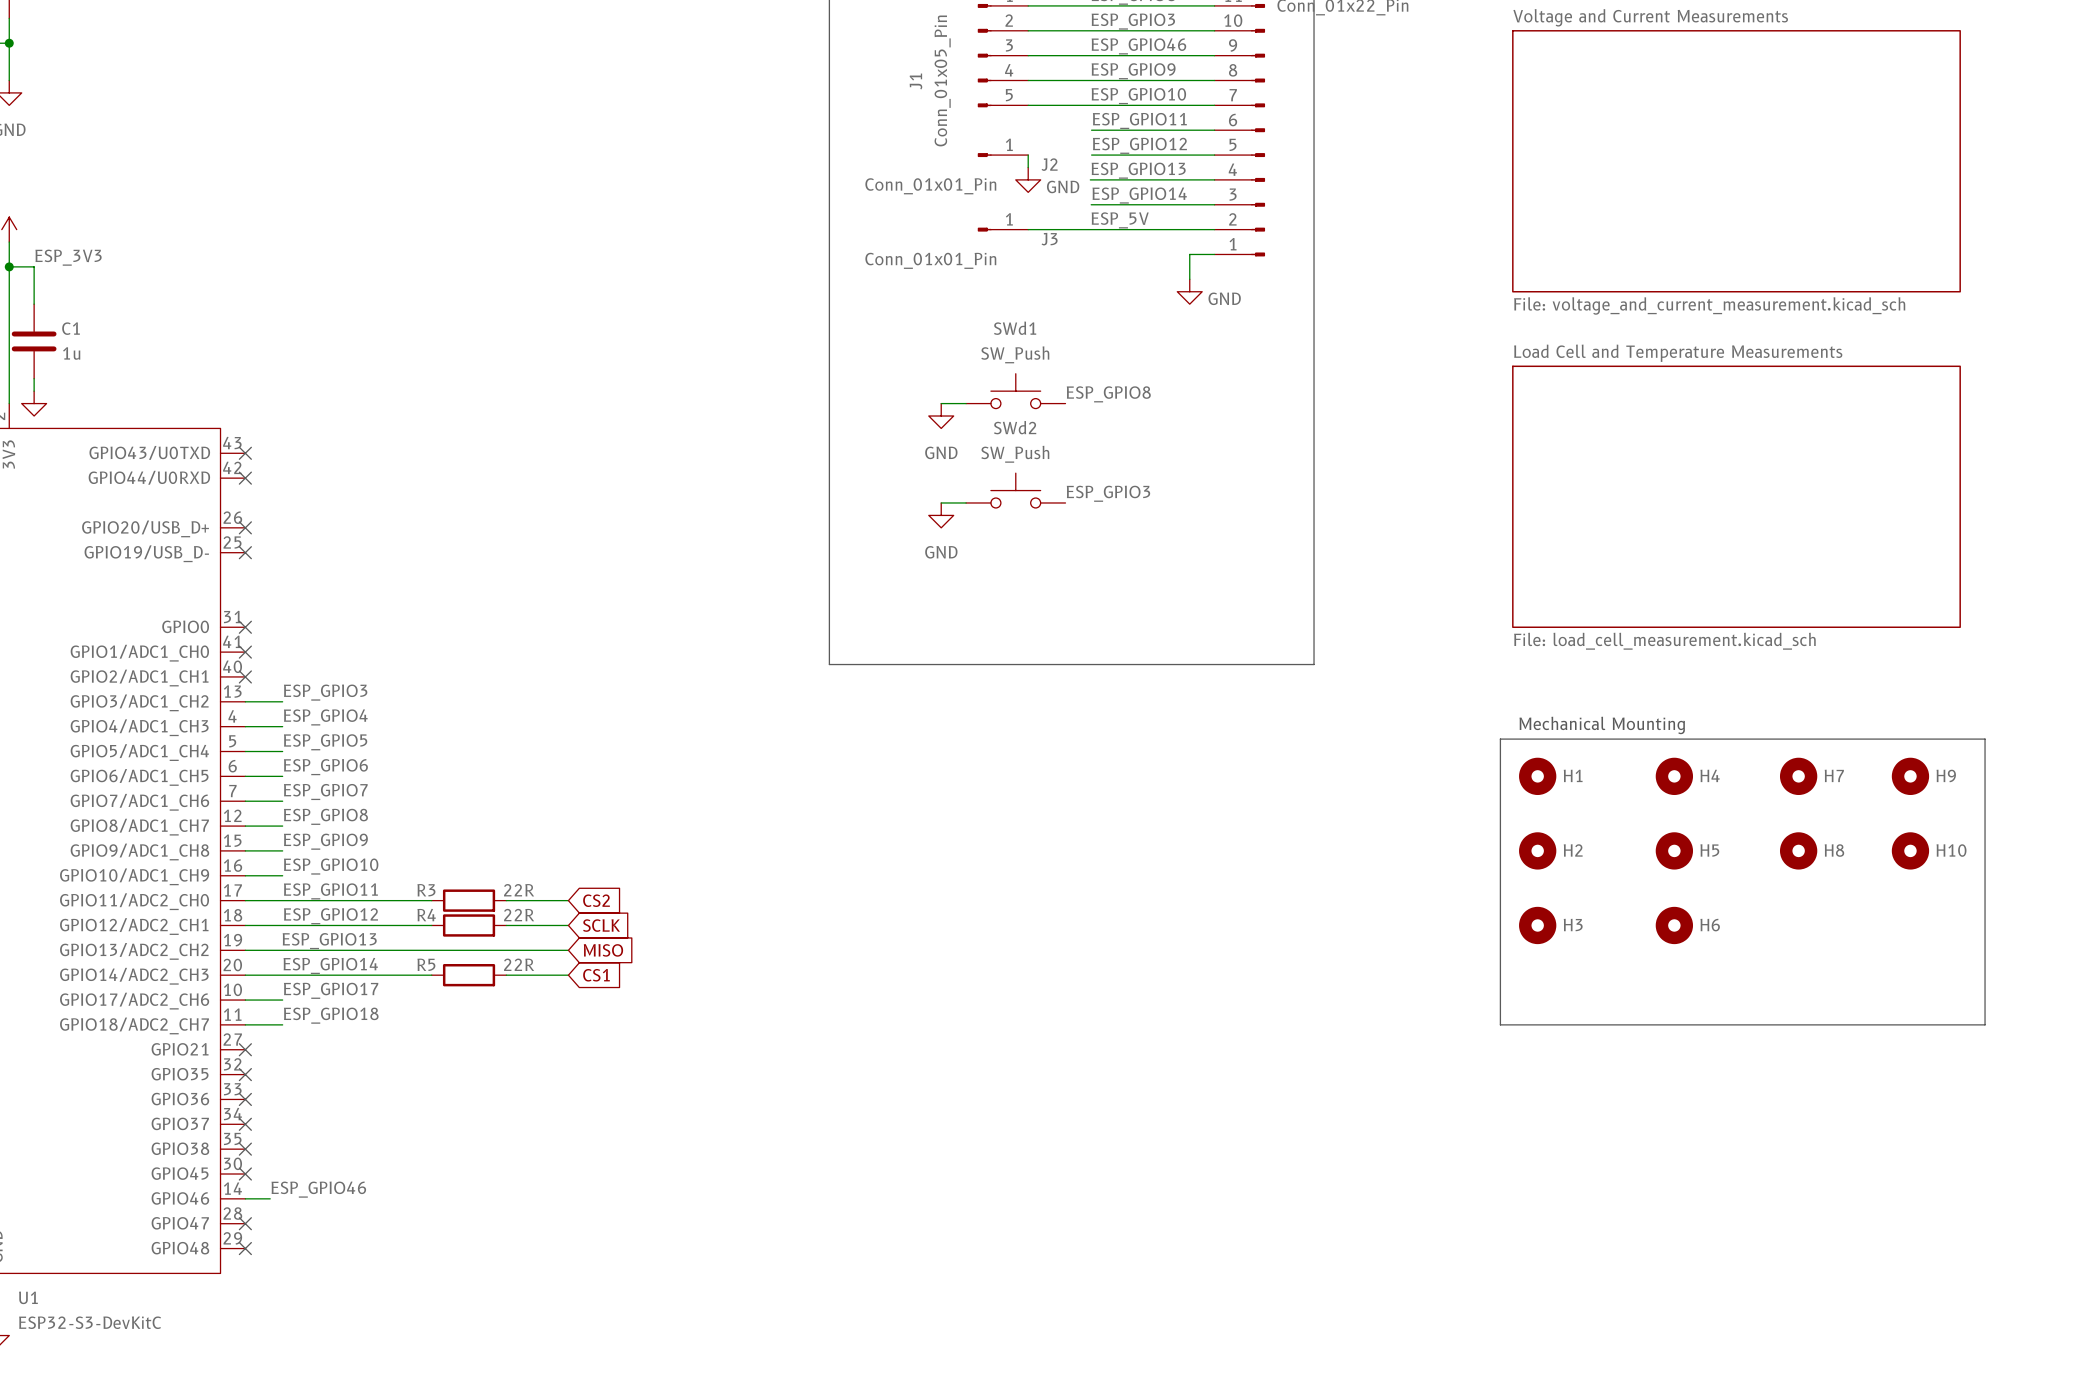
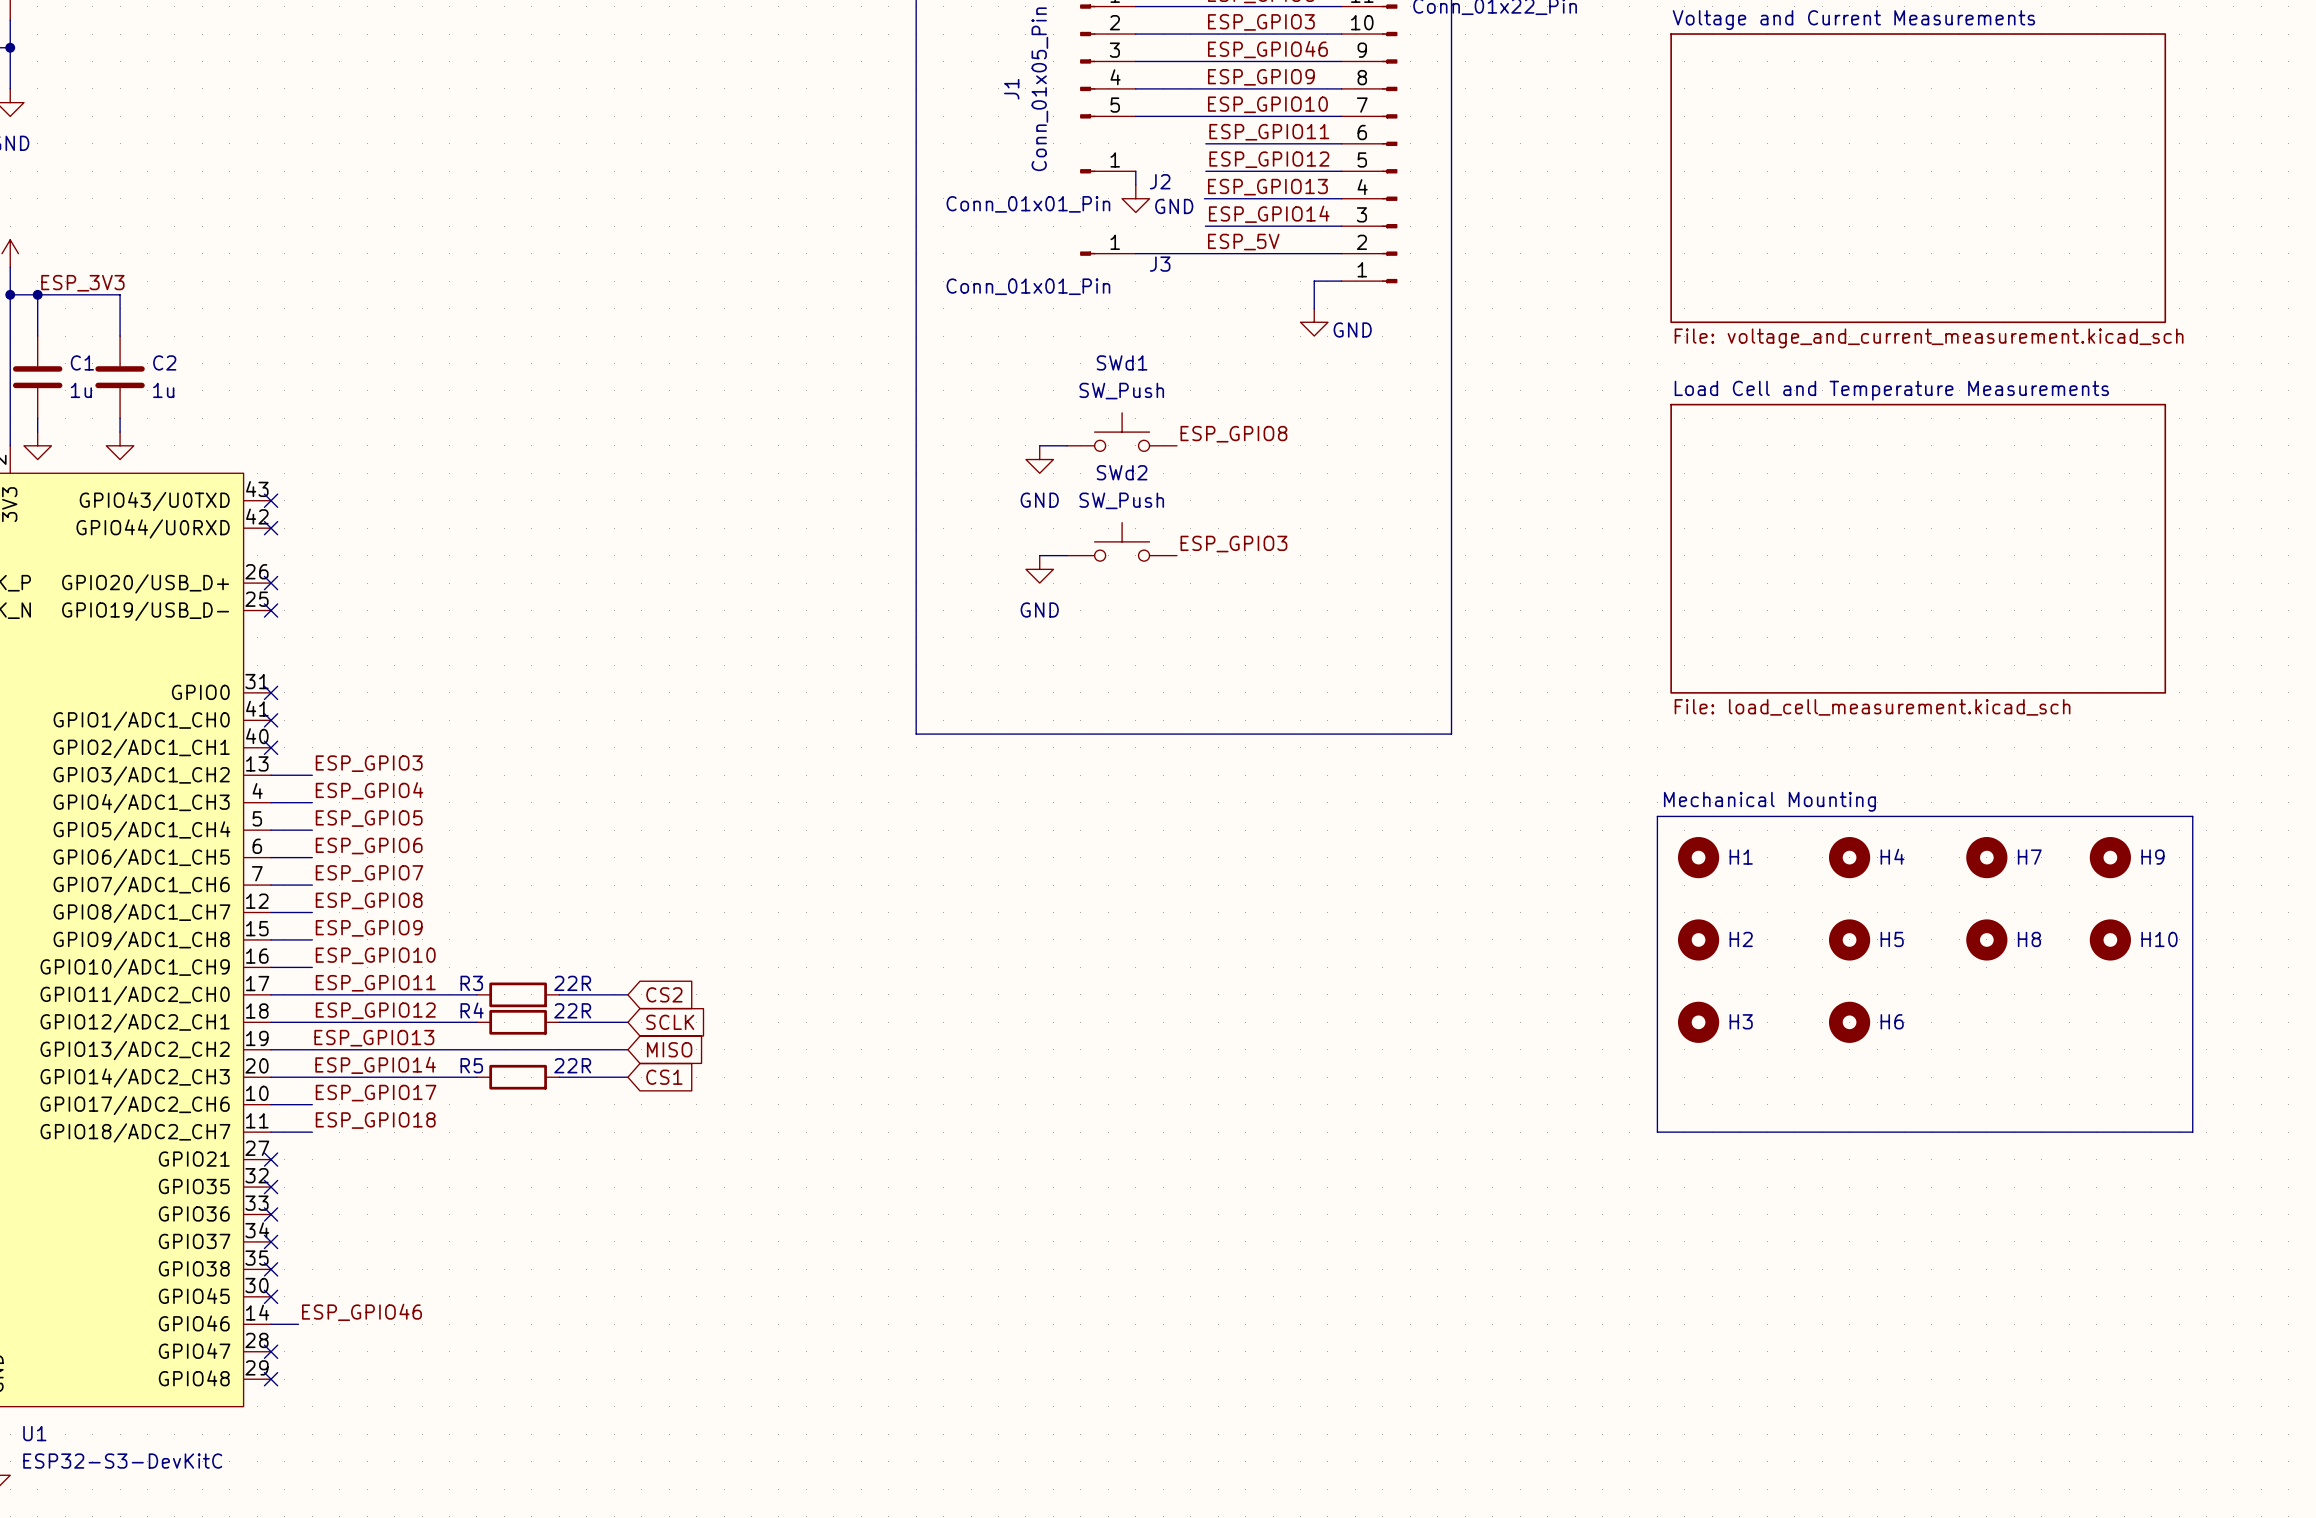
wire: none -> (37, 294) (120, 294) (120, 336)
junction: none -> (37, 294)
C2: none -> 1u (120, 377)
wire: none -> (120, 418) (120, 432)
power symbol: none -> (120, 445)

